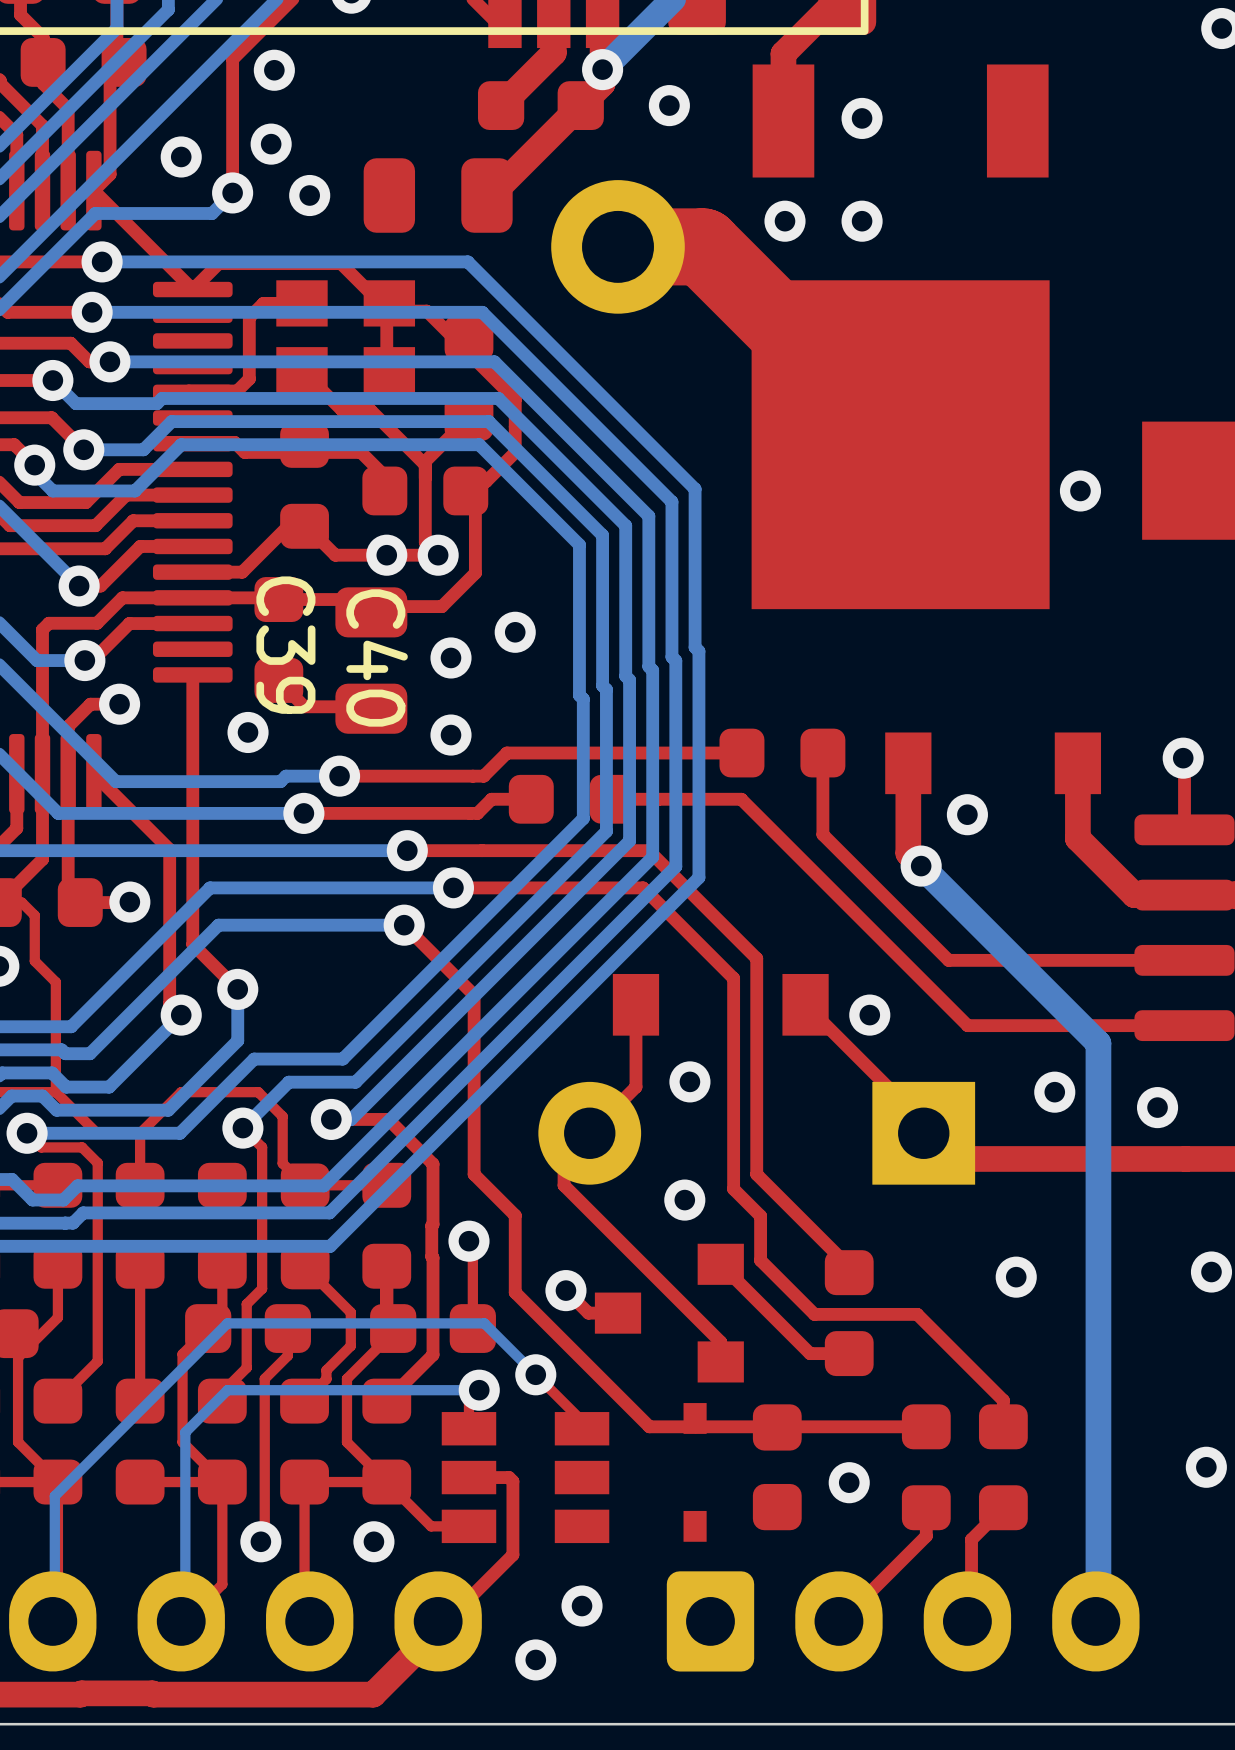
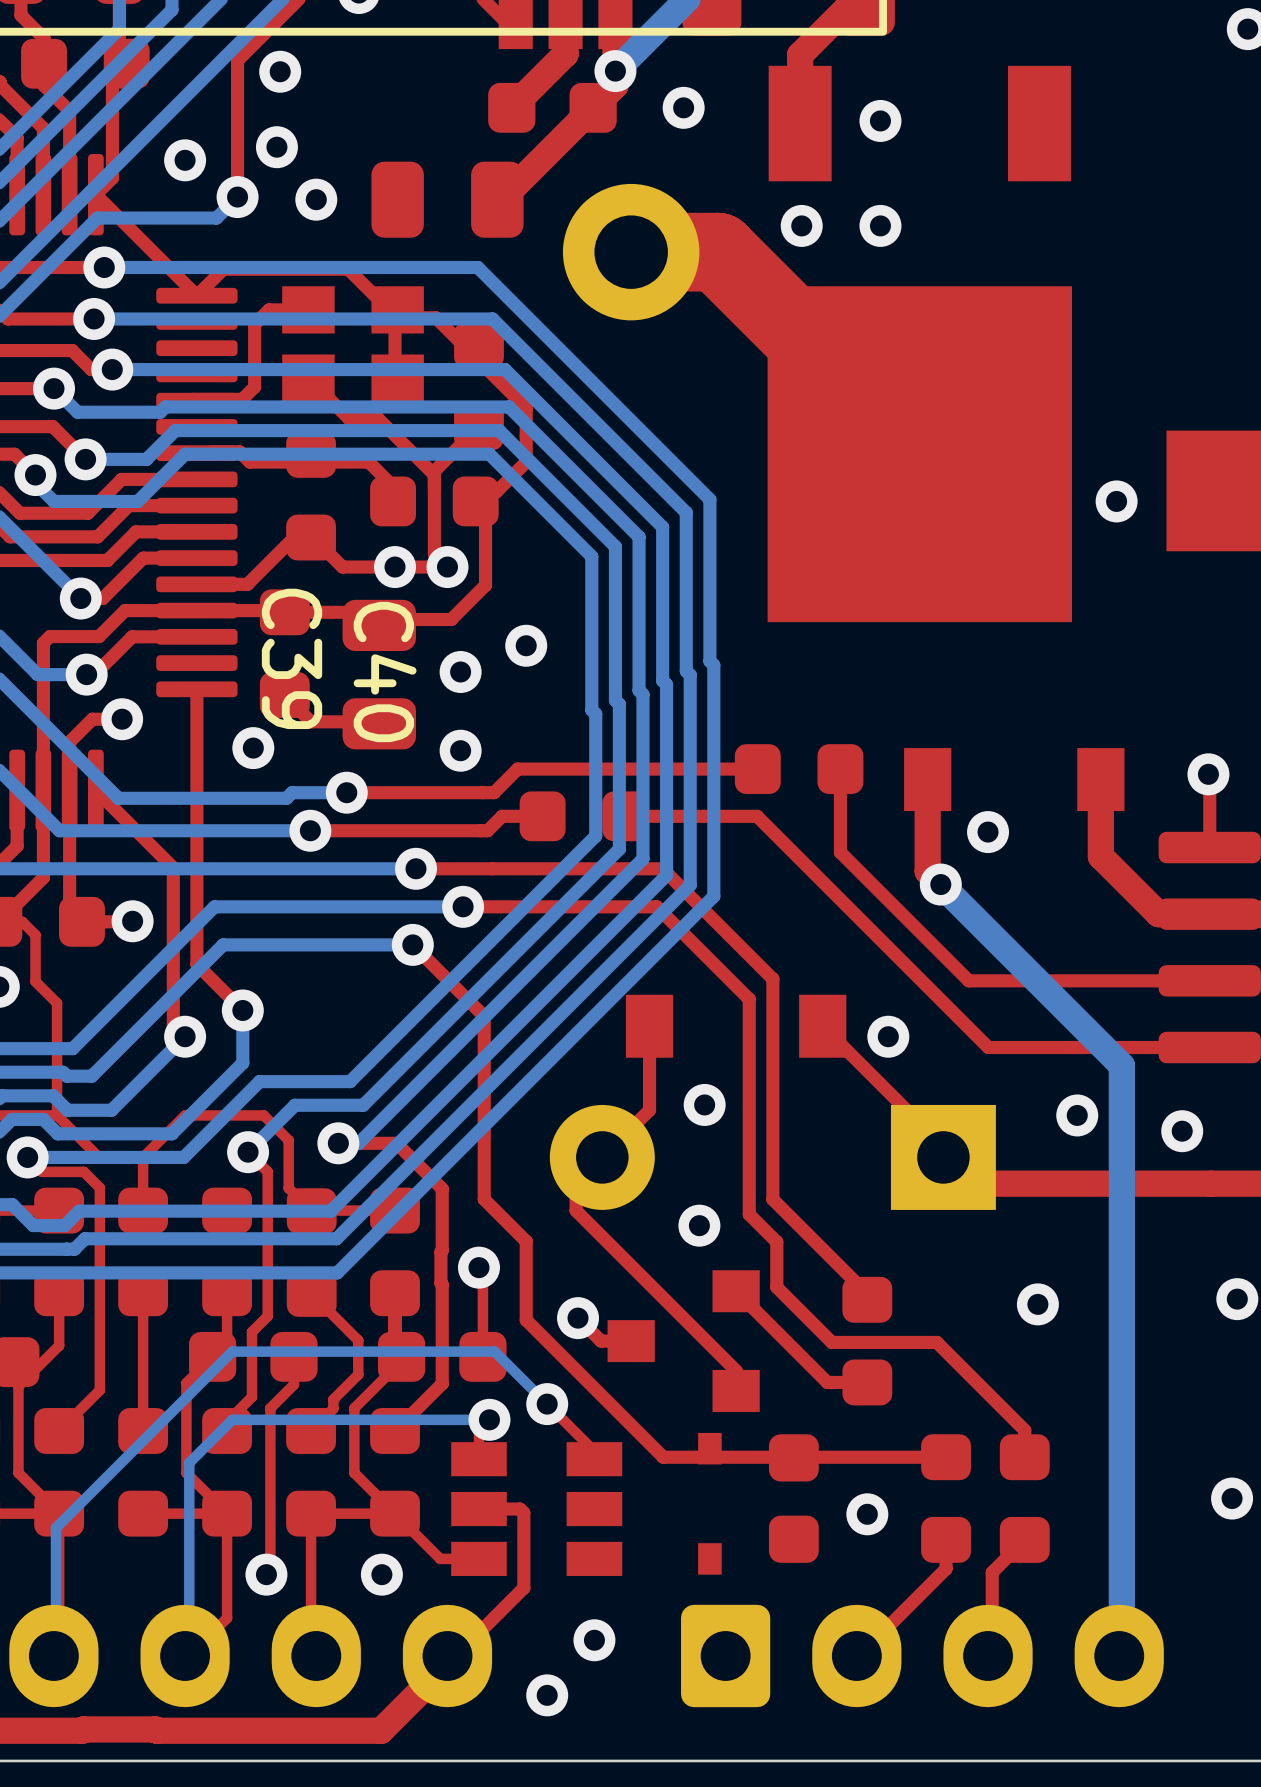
via position: (1080, 490) -> (1116, 501)

